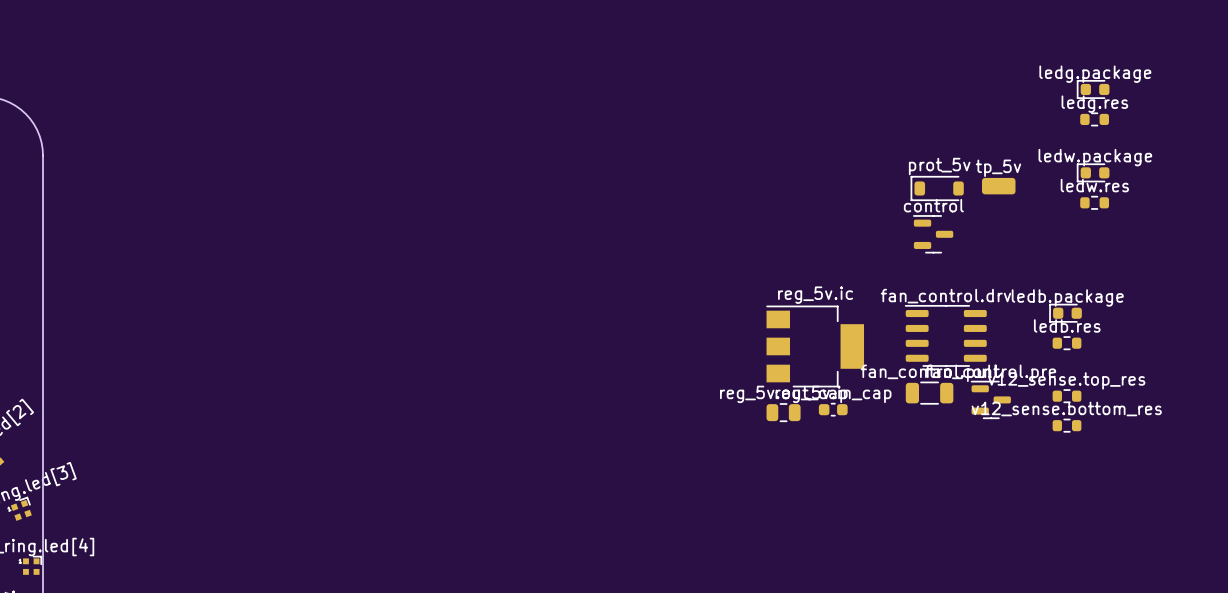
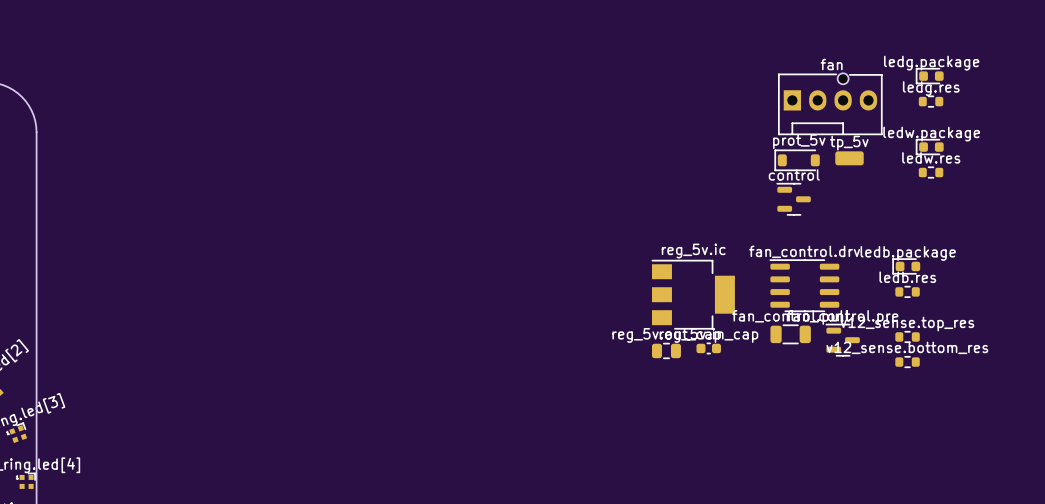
fan: none -> (830, 104)

